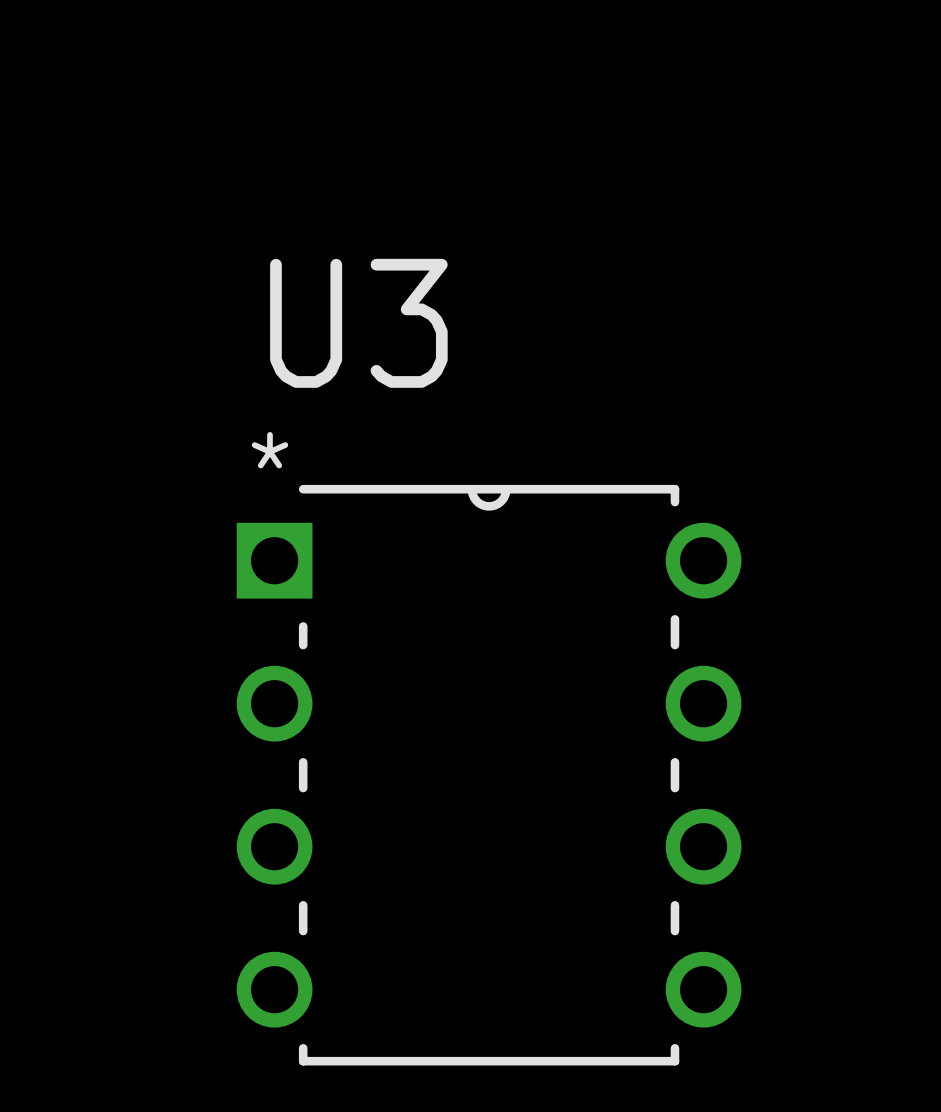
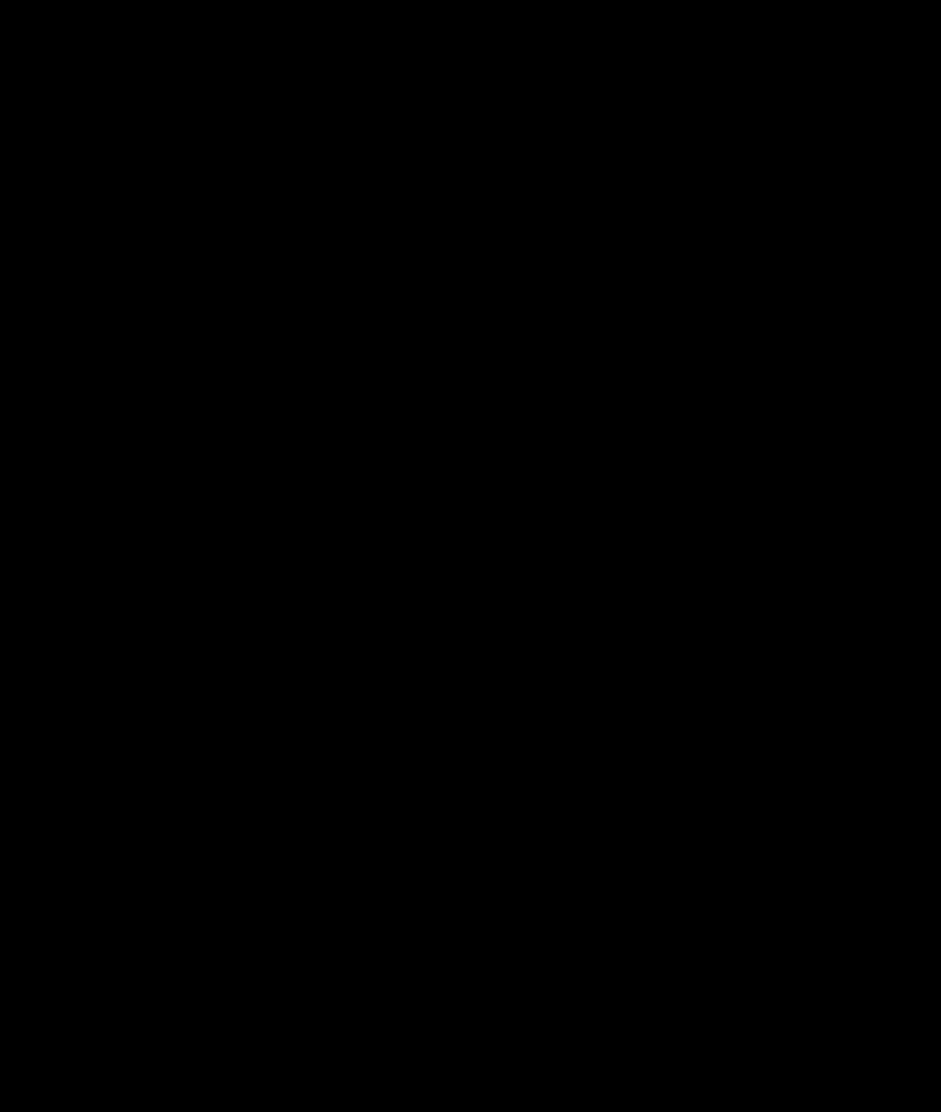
U3: (489, 775) -> none

